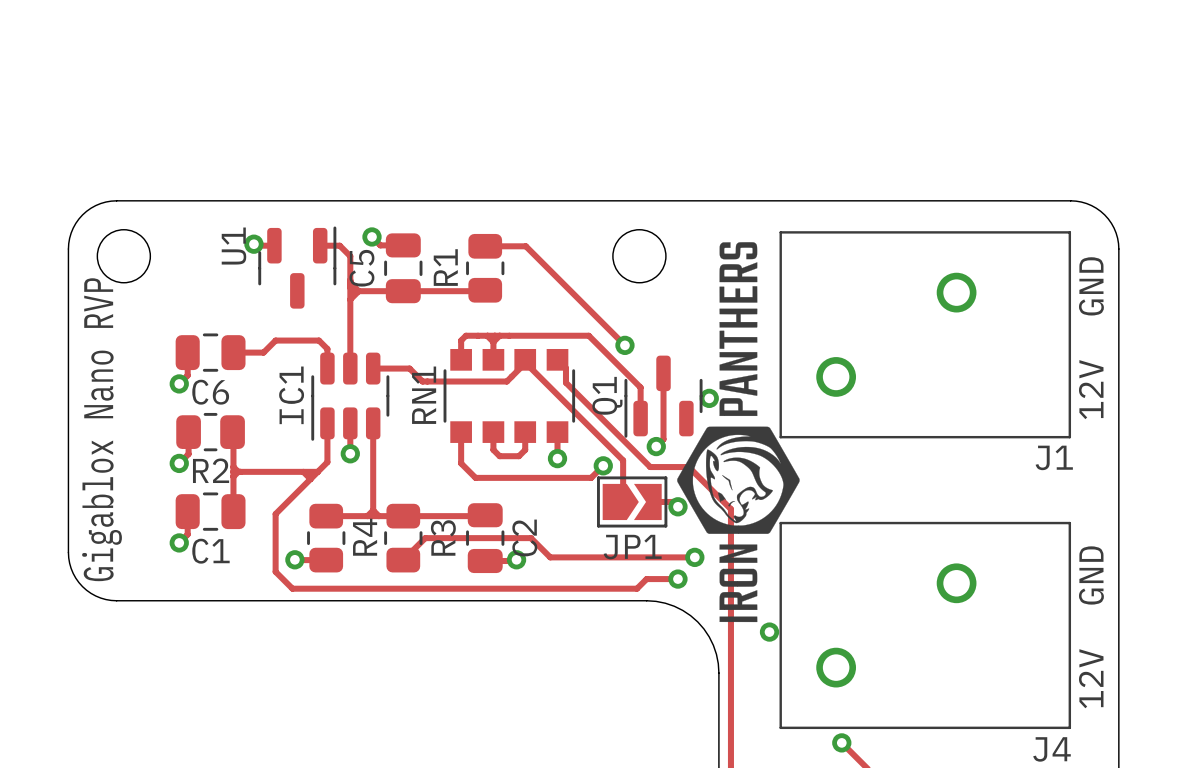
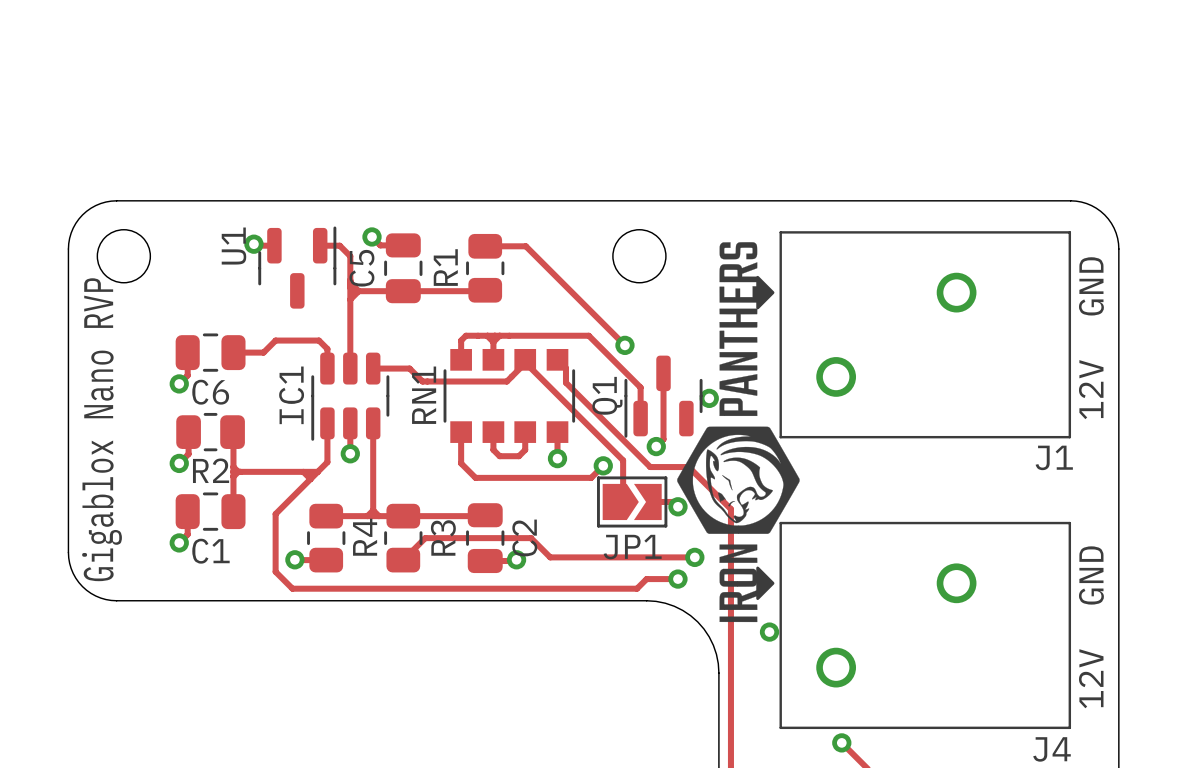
J1 footprint: [779, 231, 1072, 439] -> [756, 231, 1072, 439]
J4 footprint: [779, 521, 1072, 730] -> [756, 521, 1072, 730]

